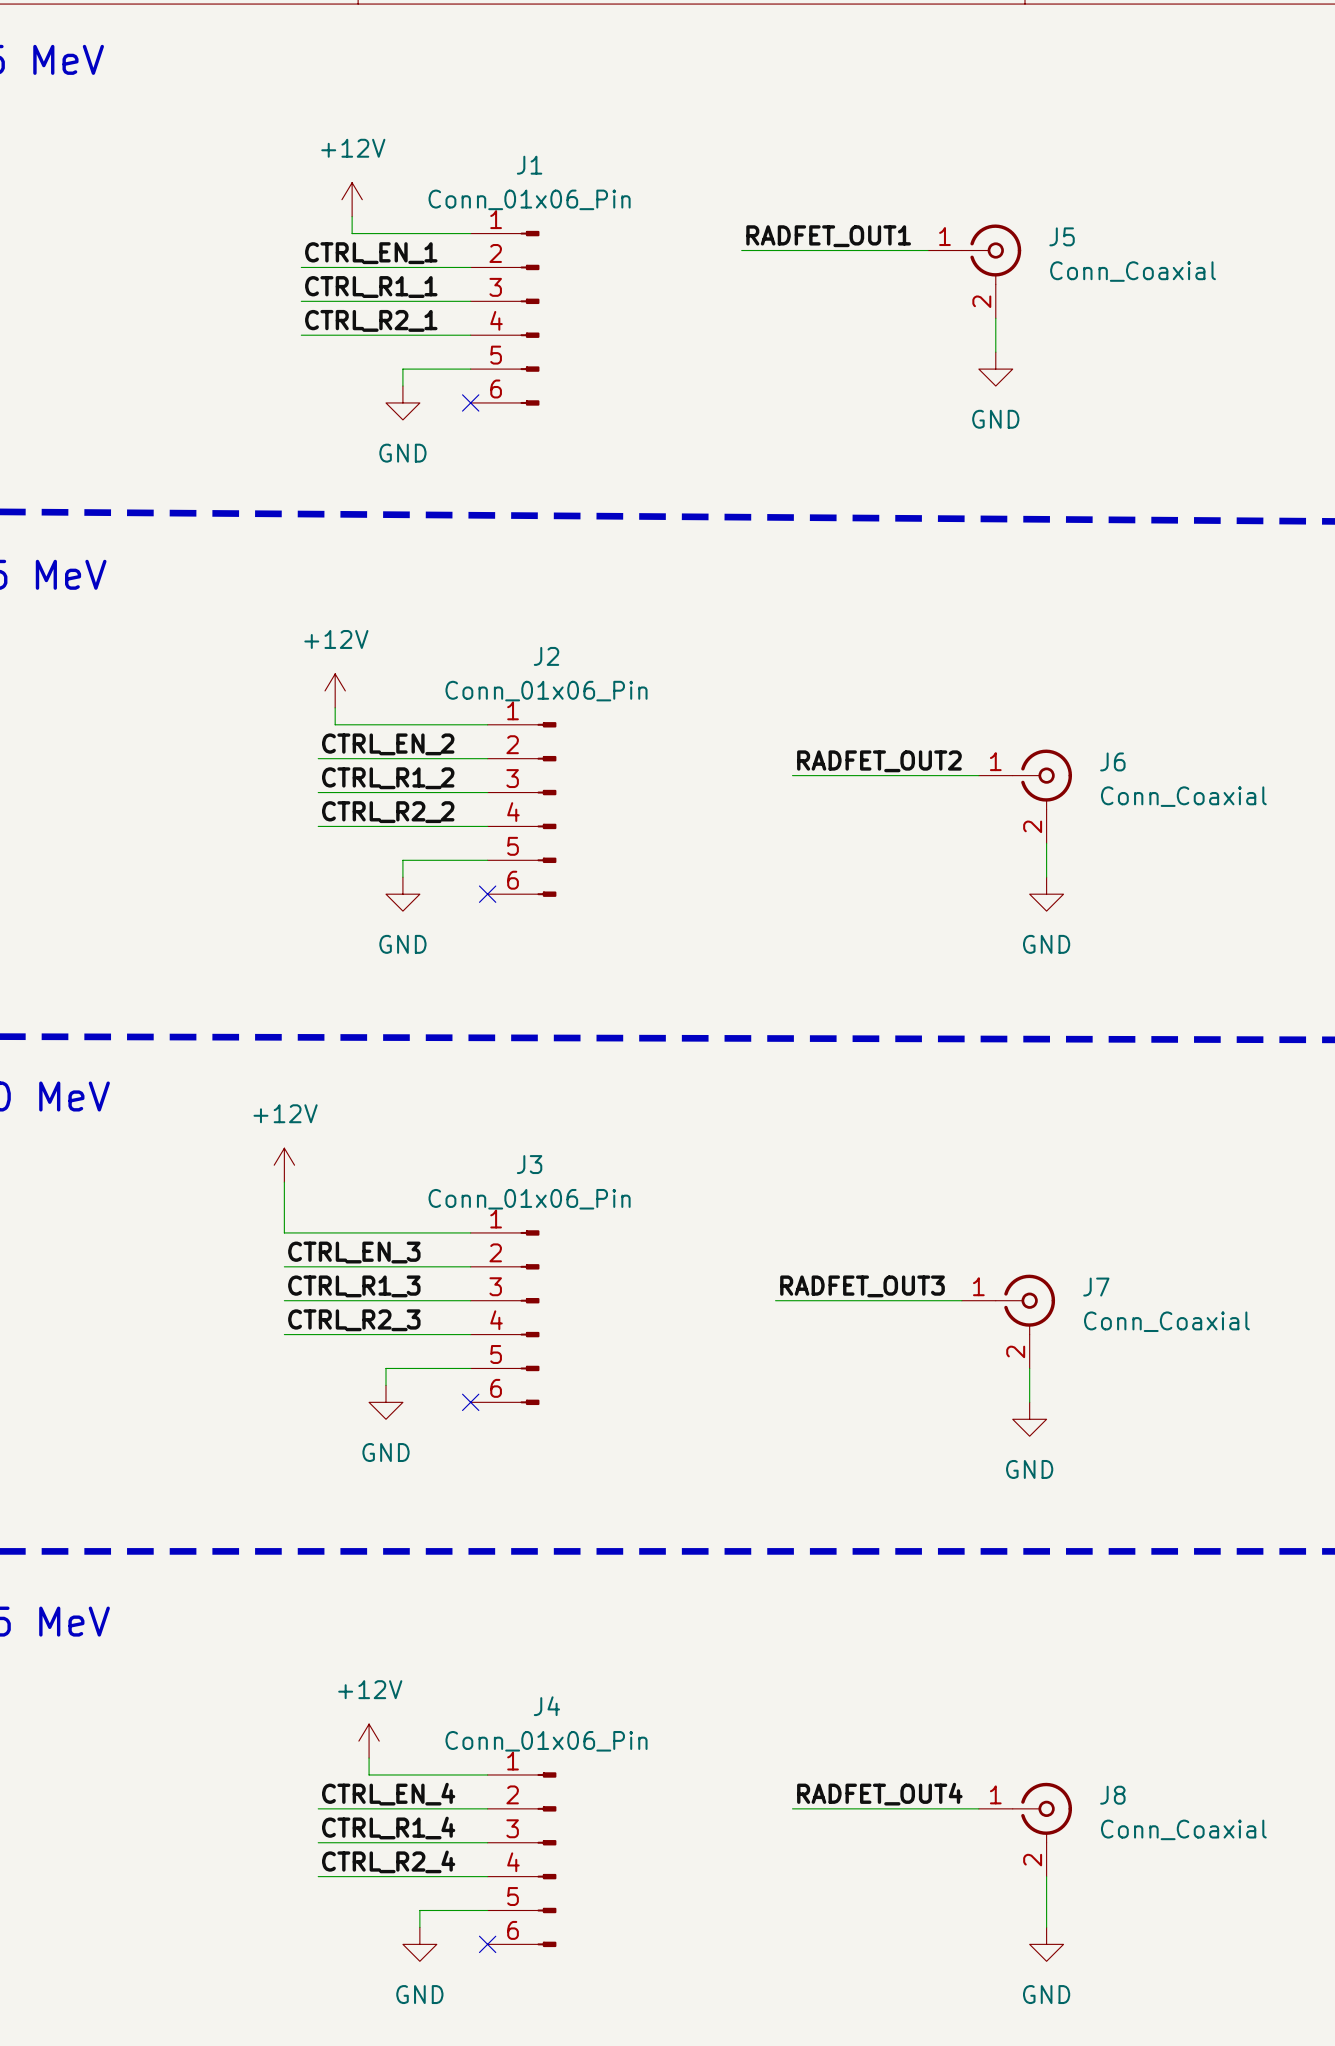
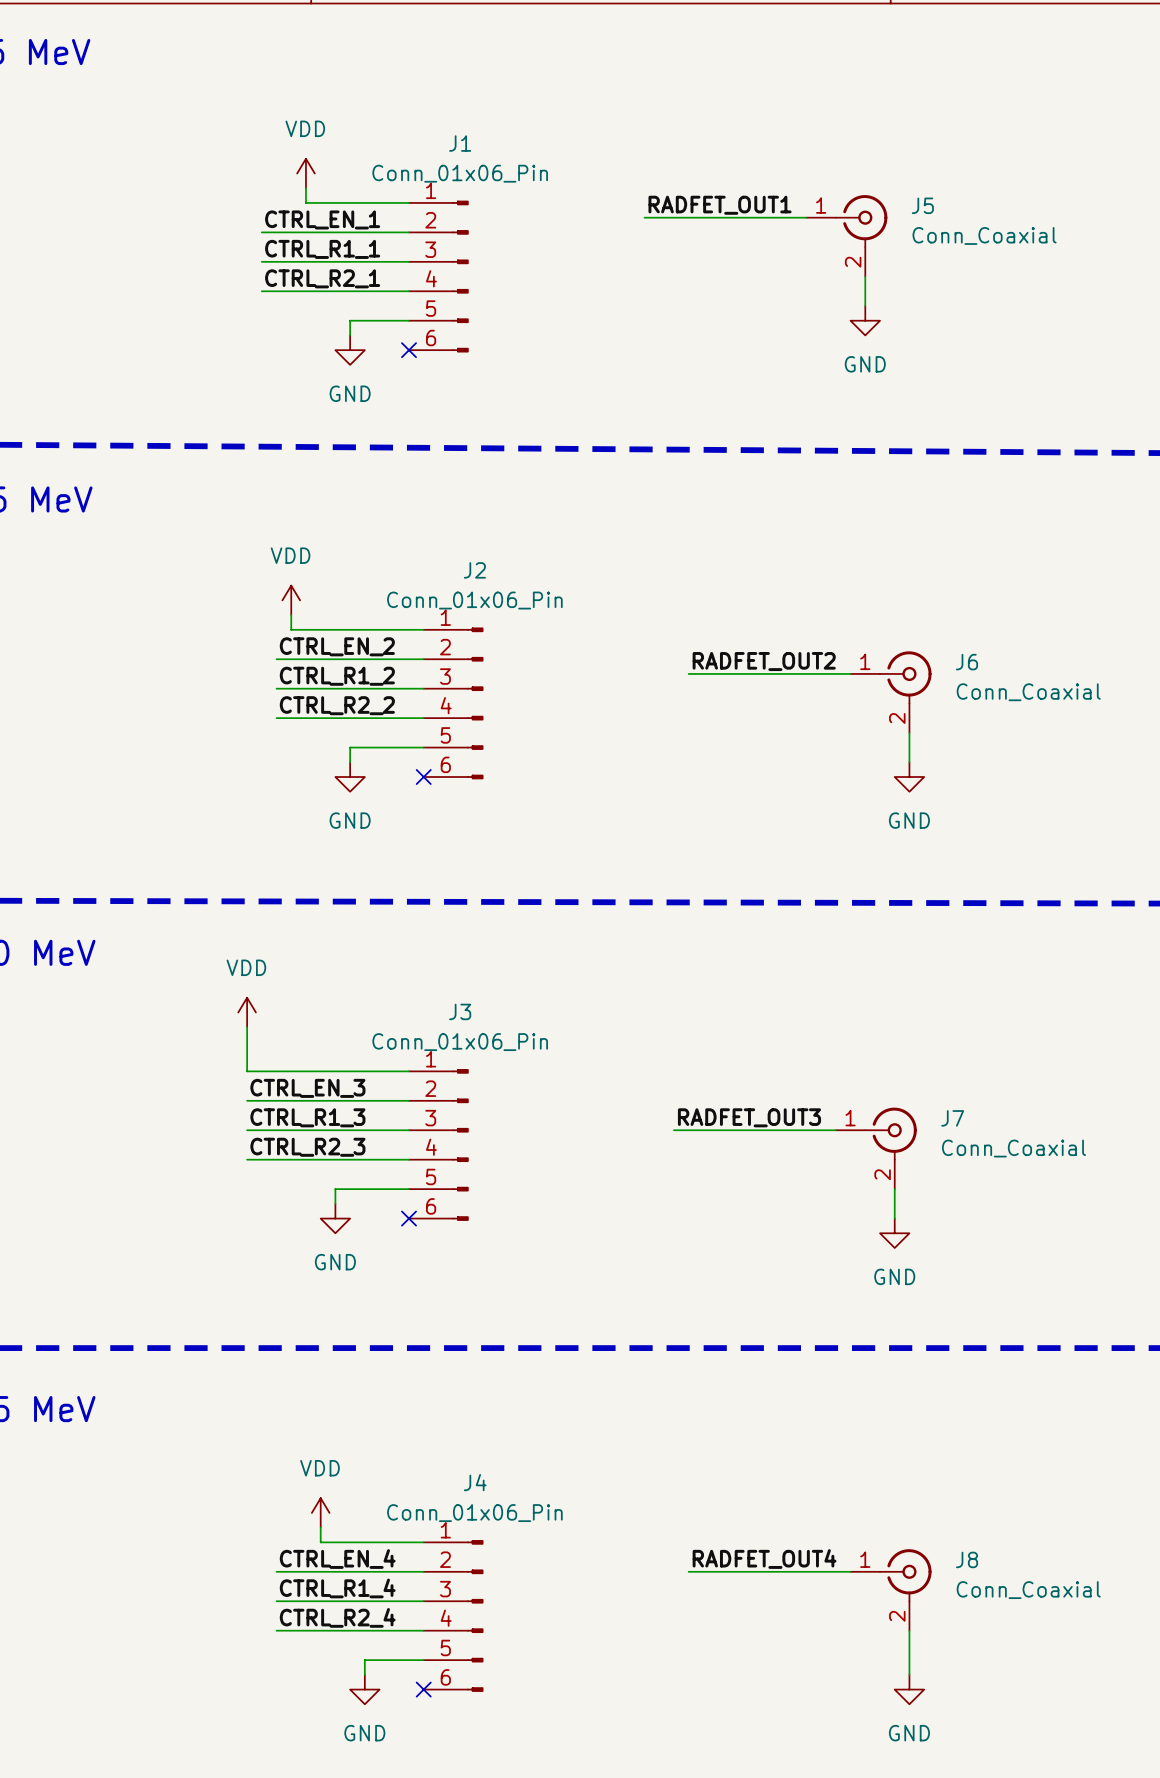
power symbol: +12V (352, 199) -> VDD (305, 173)
power symbol: +12V (335, 690) -> VDD (291, 600)
power symbol: +12V (284, 1165) -> VDD (247, 1012)
power symbol: +12V (369, 1741) -> VDD (320, 1512)

